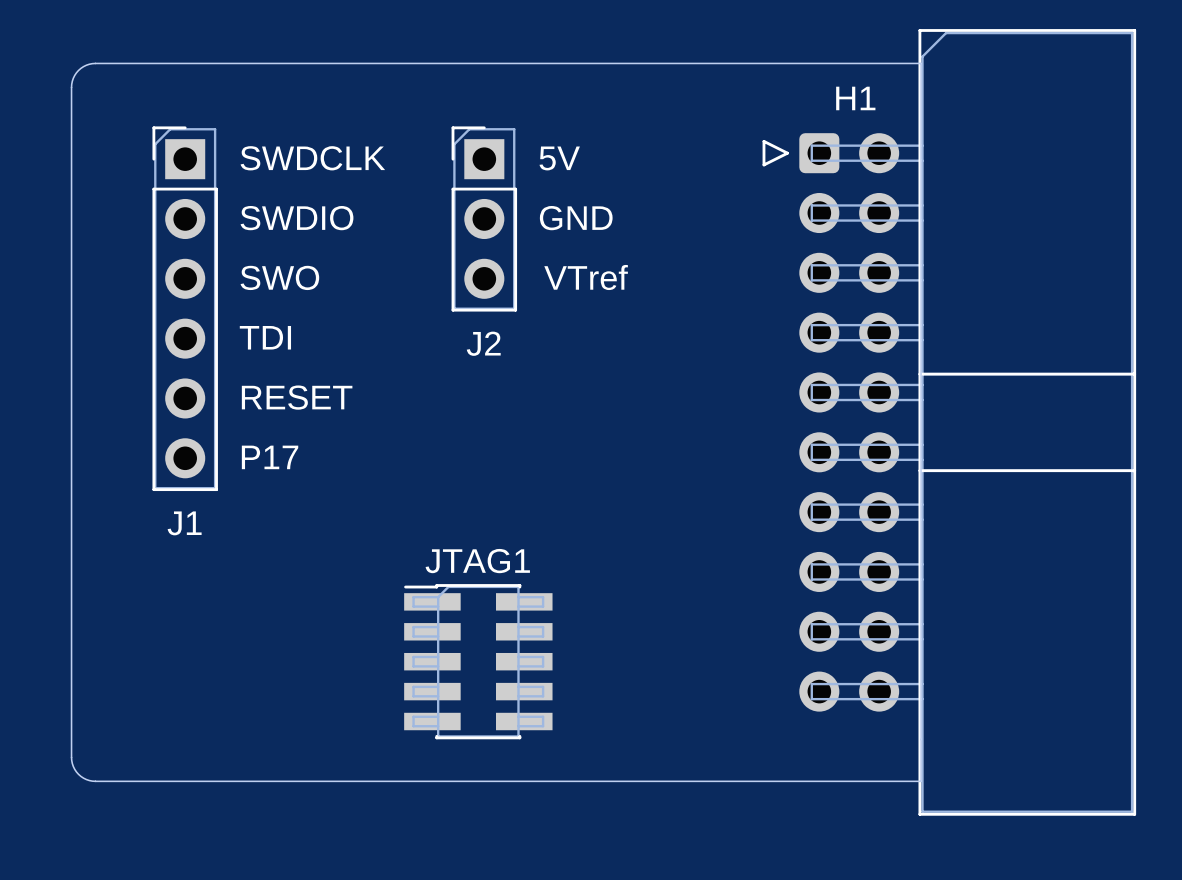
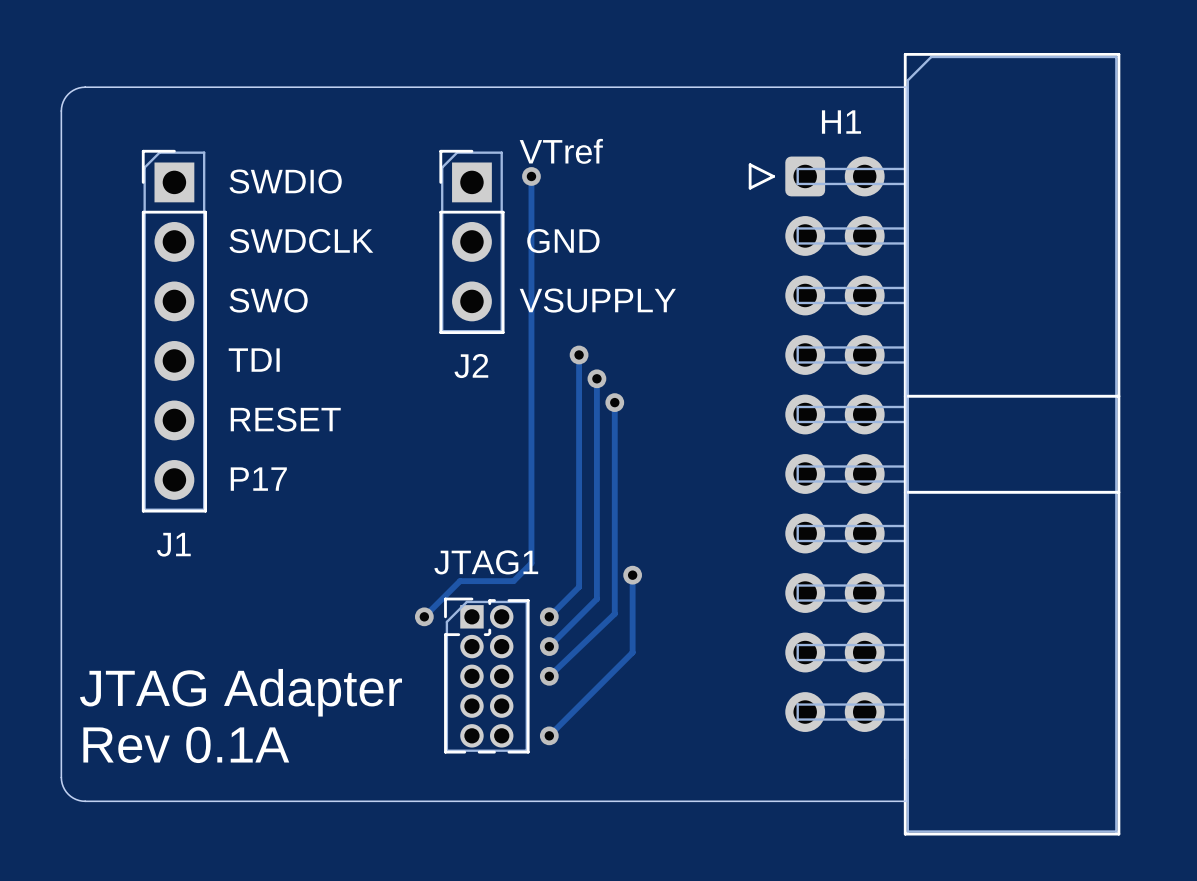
track: none -> (531, 176) (531, 563) (513, 581) (460, 581) (424, 616)
via: none -> (531, 176)
text: SWDCLK (312, 158) -> SWDIO (285, 181)
text: 5V (559, 158) -> none
text: SWDIO (297, 218) -> SWDCLK (301, 241)
text position: VTref (586, 277) -> VTref (561, 151)
text: none -> VSUPPLY (597, 300)
track: none -> (579, 354) (579, 587) (549, 616)
via: none -> (579, 354)
track: none -> (596, 378) (596, 598) (549, 646)
via: none -> (596, 378)
track: none -> (614, 402) (614, 613) (549, 676)
via: none -> (614, 402)
track: none -> (632, 575) (632, 652) (549, 735)
via: none -> (632, 575)
JTAG1 footprint: [404, 584, 553, 740] -> [444, 597, 530, 754]
via: none -> (424, 616)
via: none -> (549, 616)
via: none -> (549, 646)
via: none -> (549, 676)
text: none -> JTAG Adapter (241, 692)
via: none -> (549, 735)
text: none -> Rev 0.1A (186, 744)

